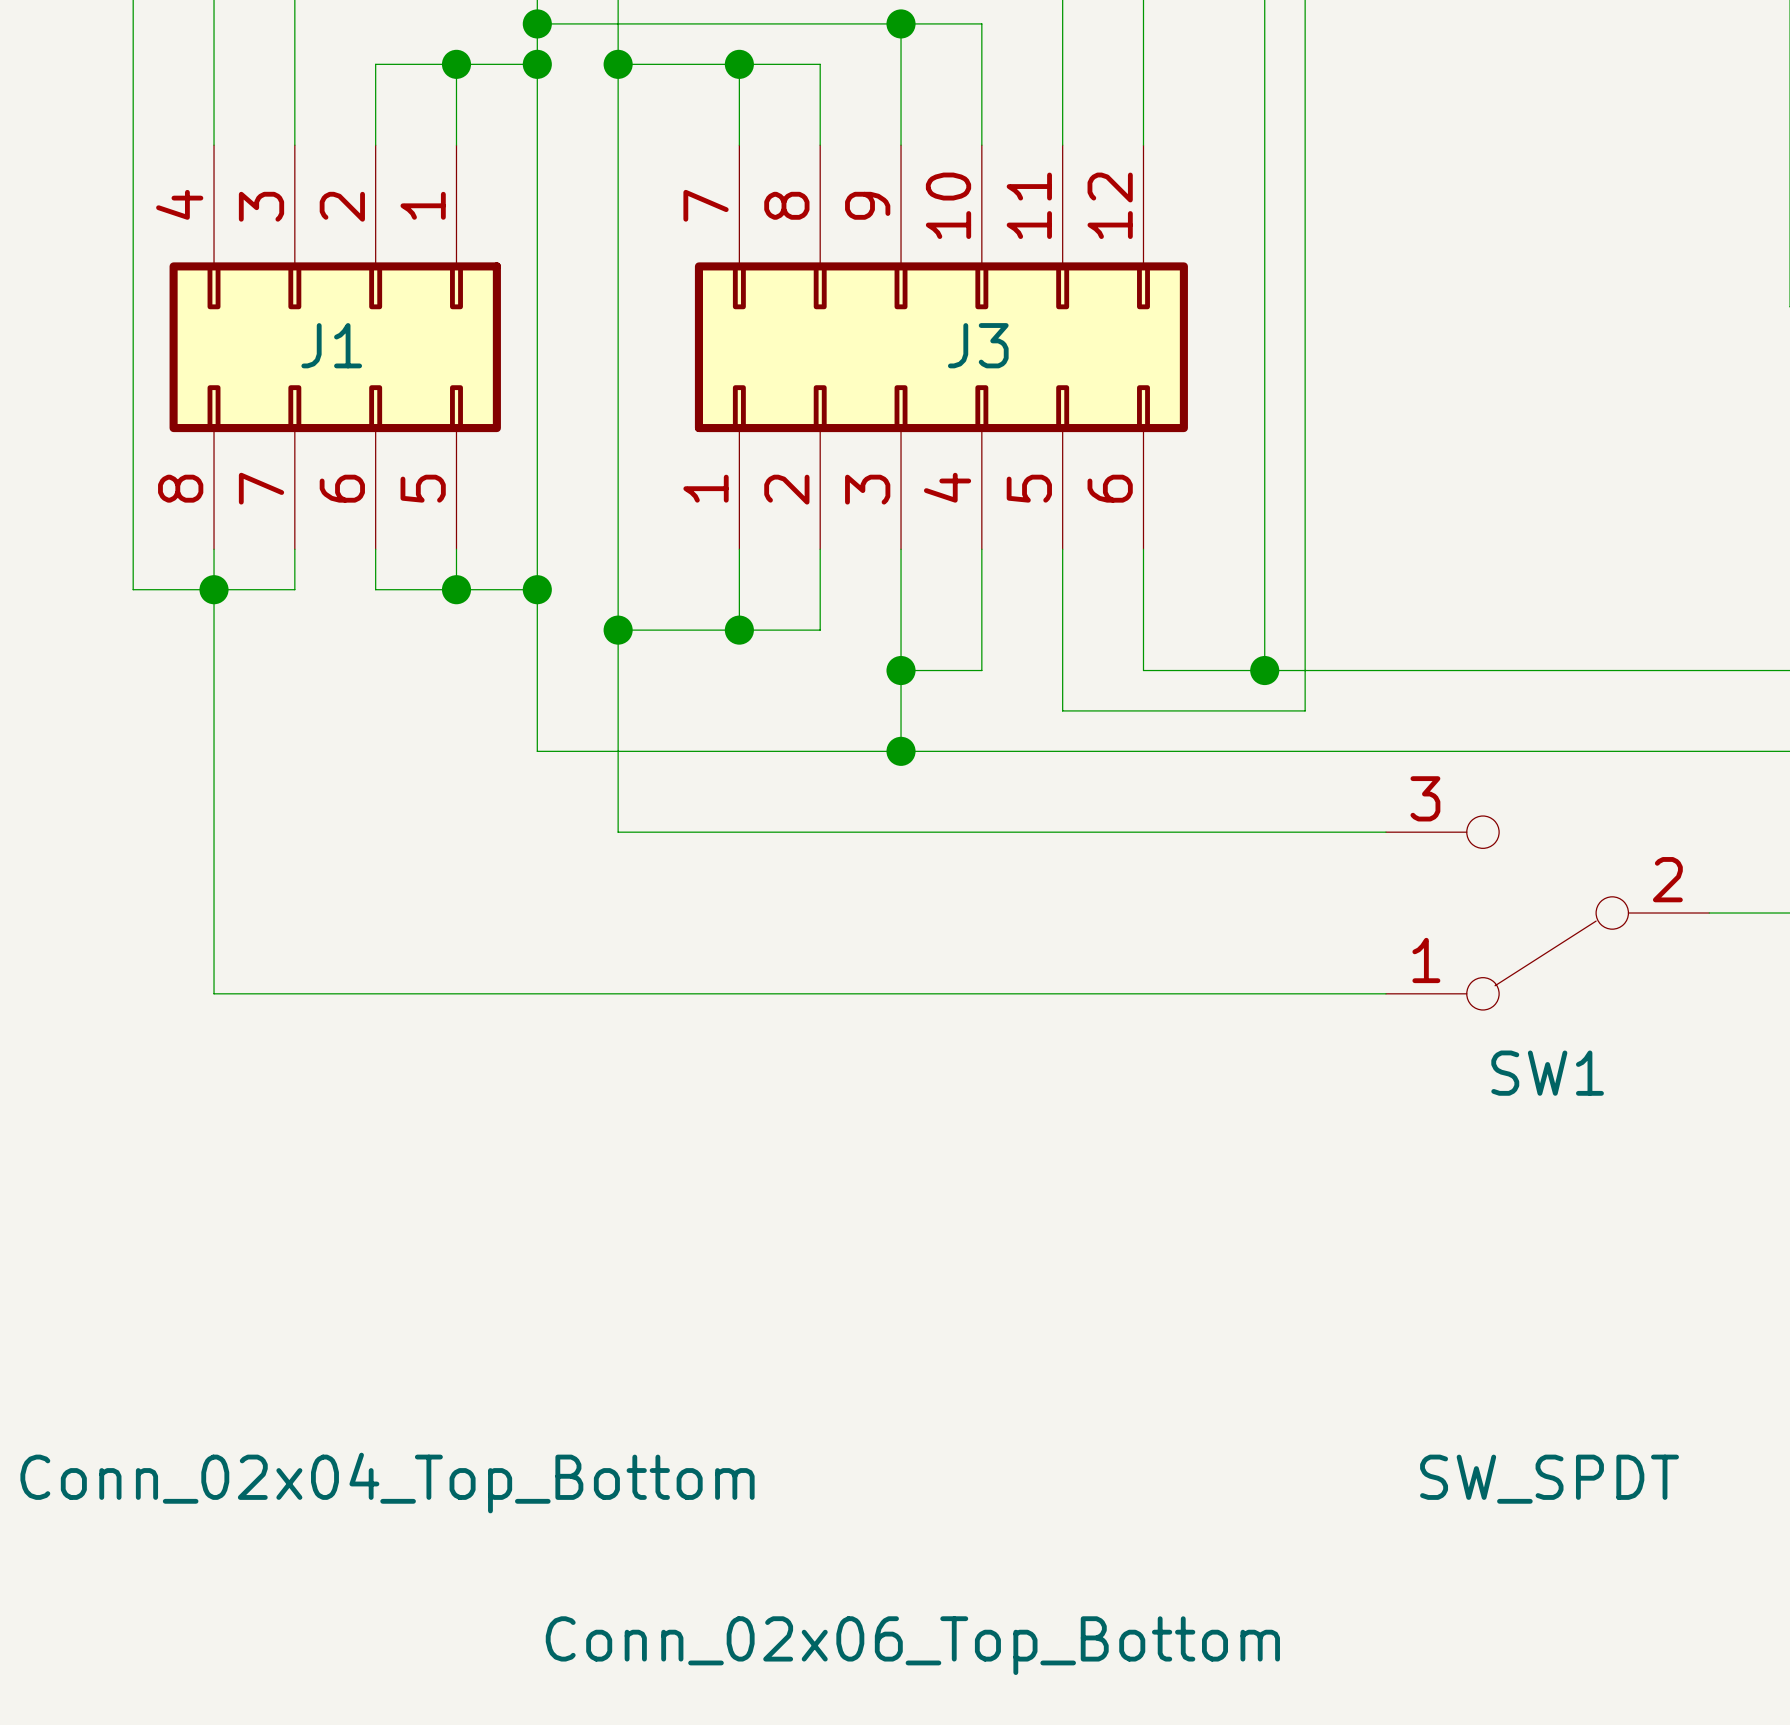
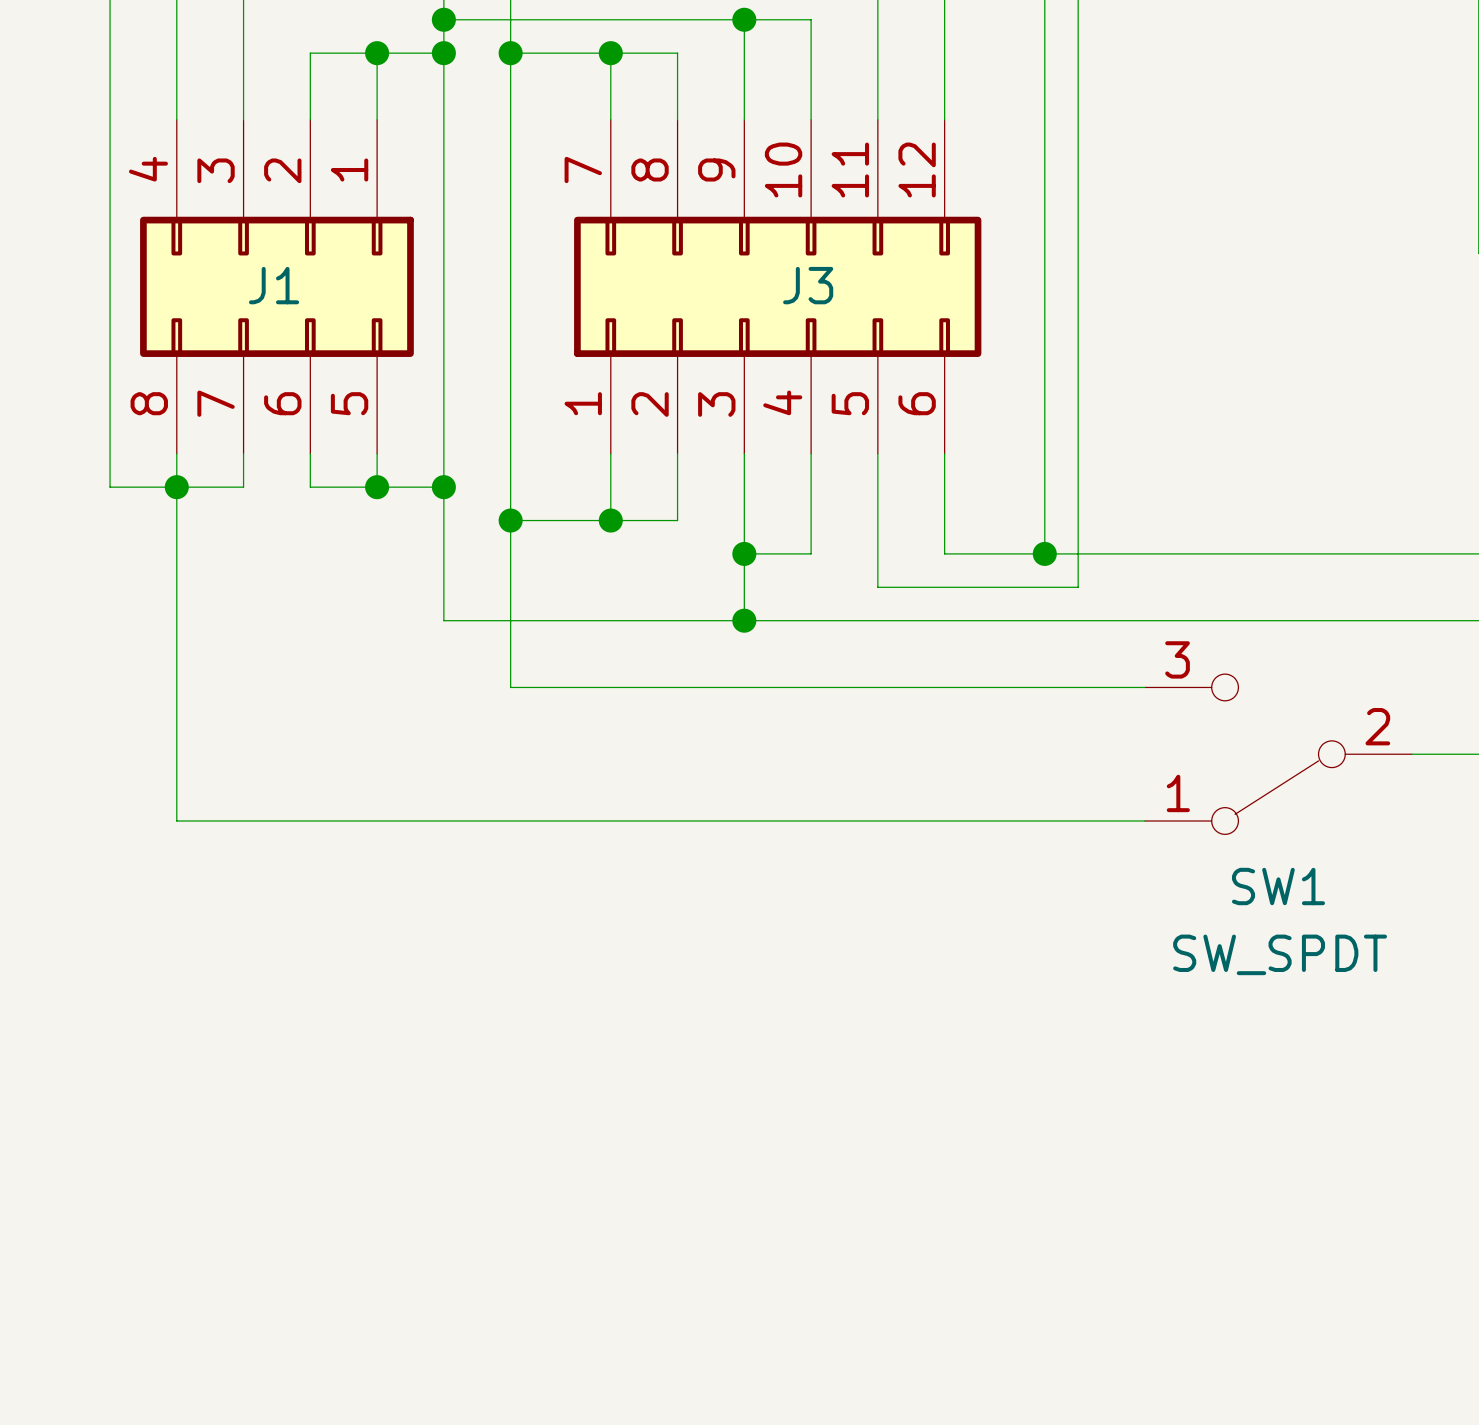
SW1 value position: SW_SPDT (1549, 1479) -> SW_SPDT (1280, 954)
J1 value: Conn_02x04_Top_Bottom (387, 1483) -> none
J3 value: Conn_02x06_Top_Bottom (912, 1645) -> none

